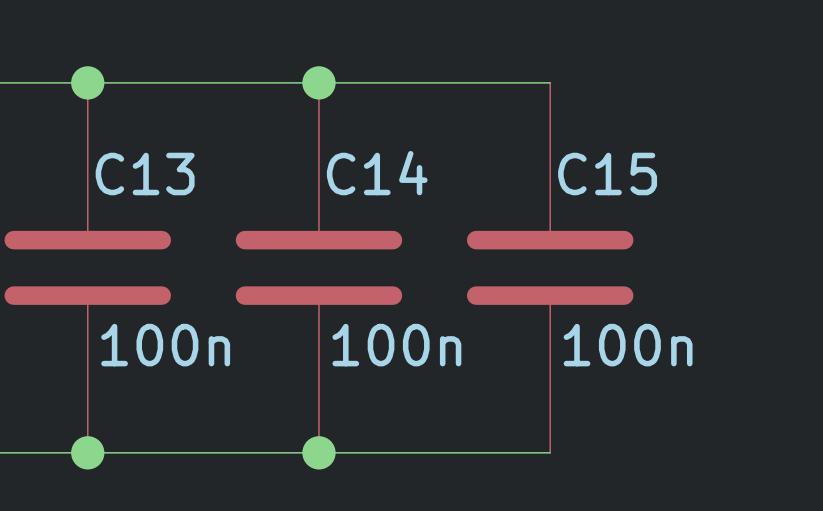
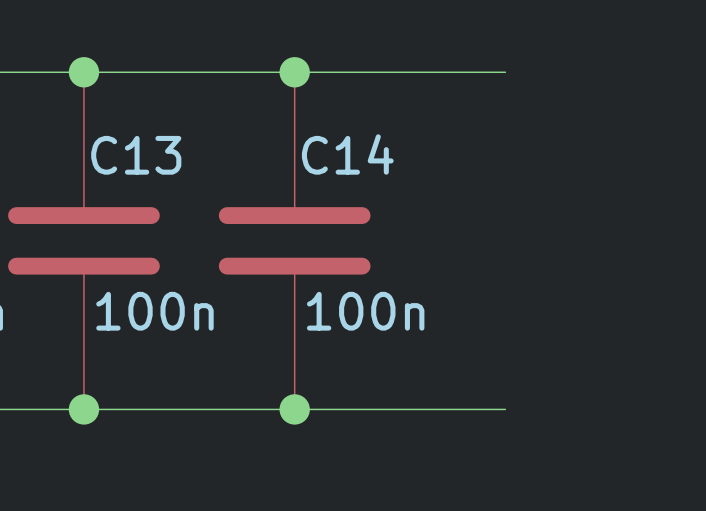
C15: 100n (550, 267) -> none

